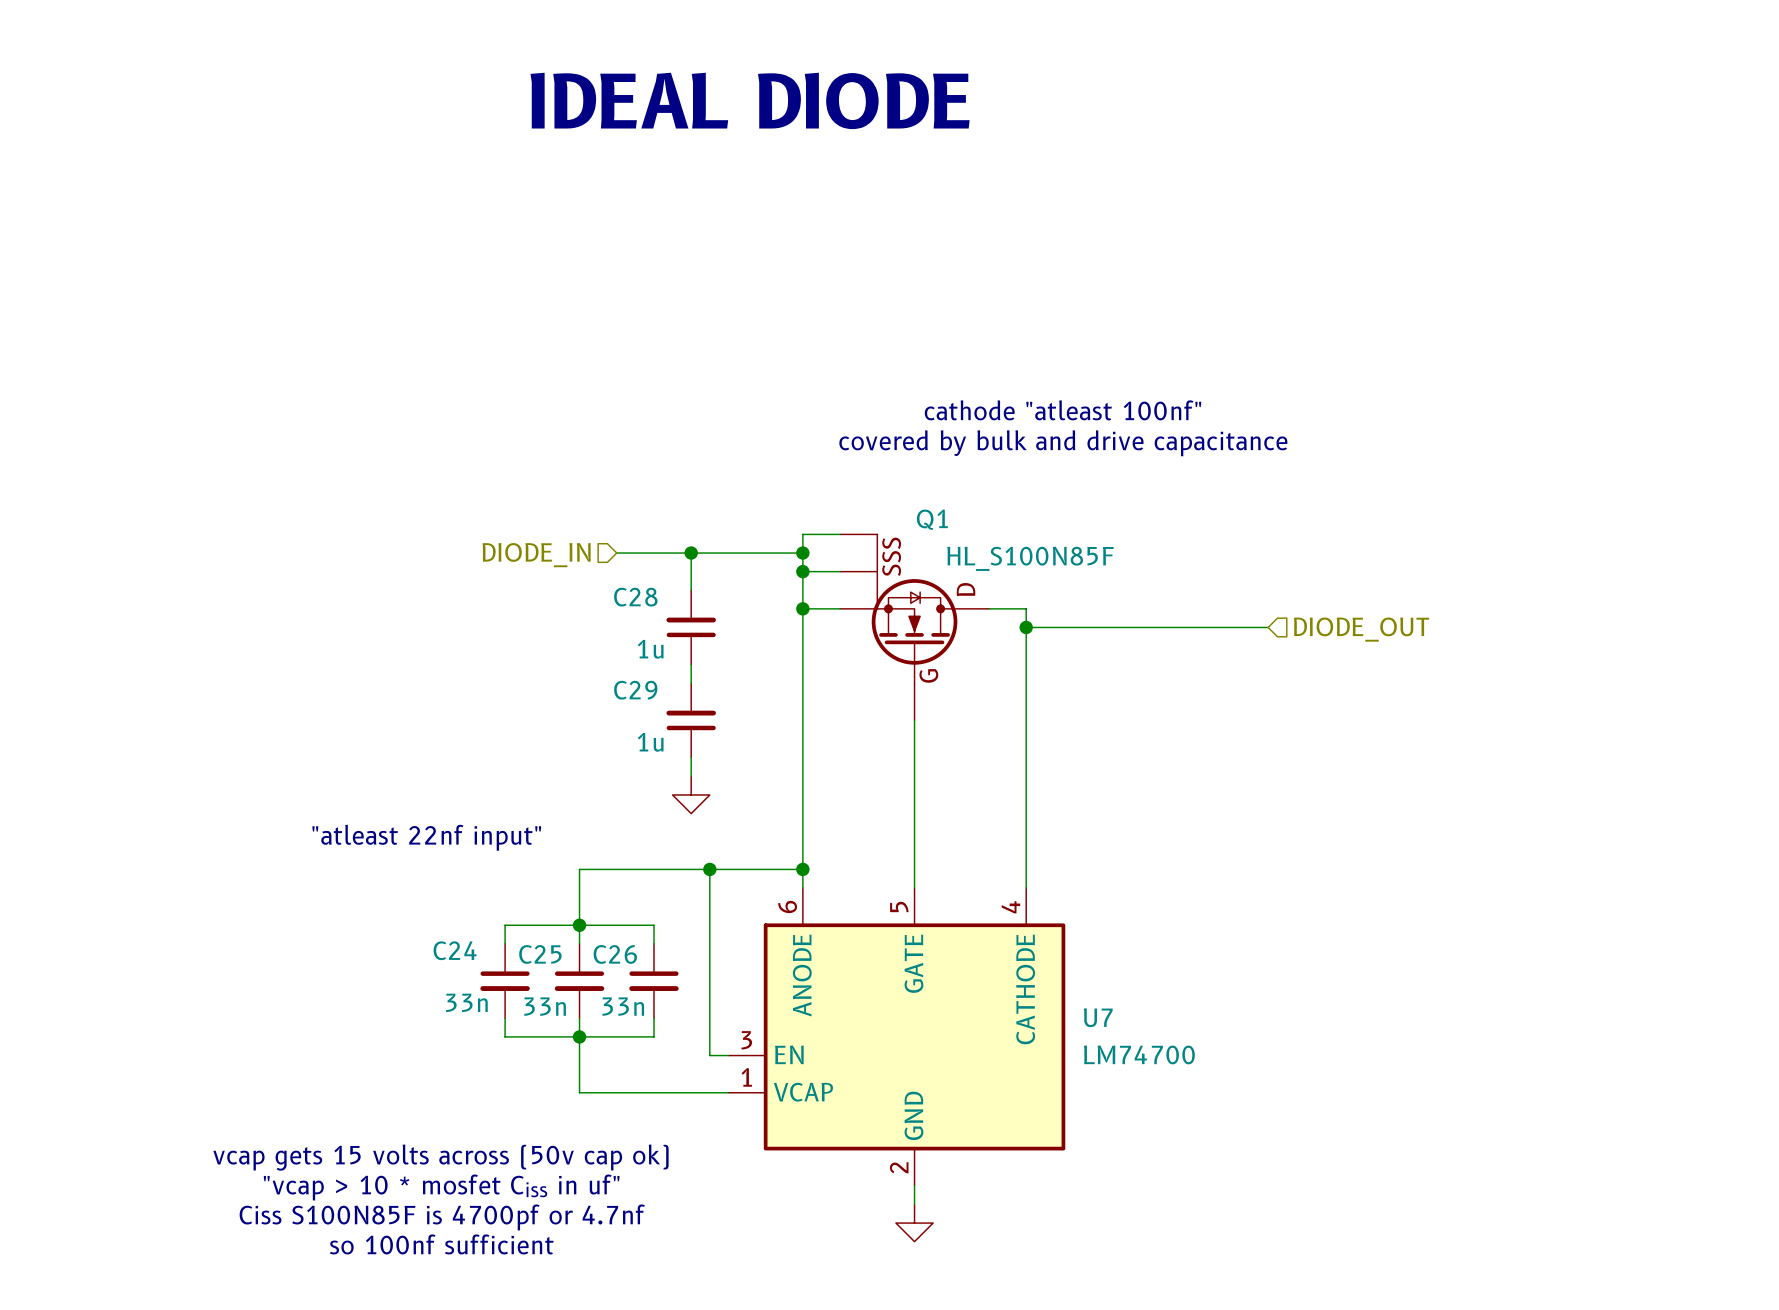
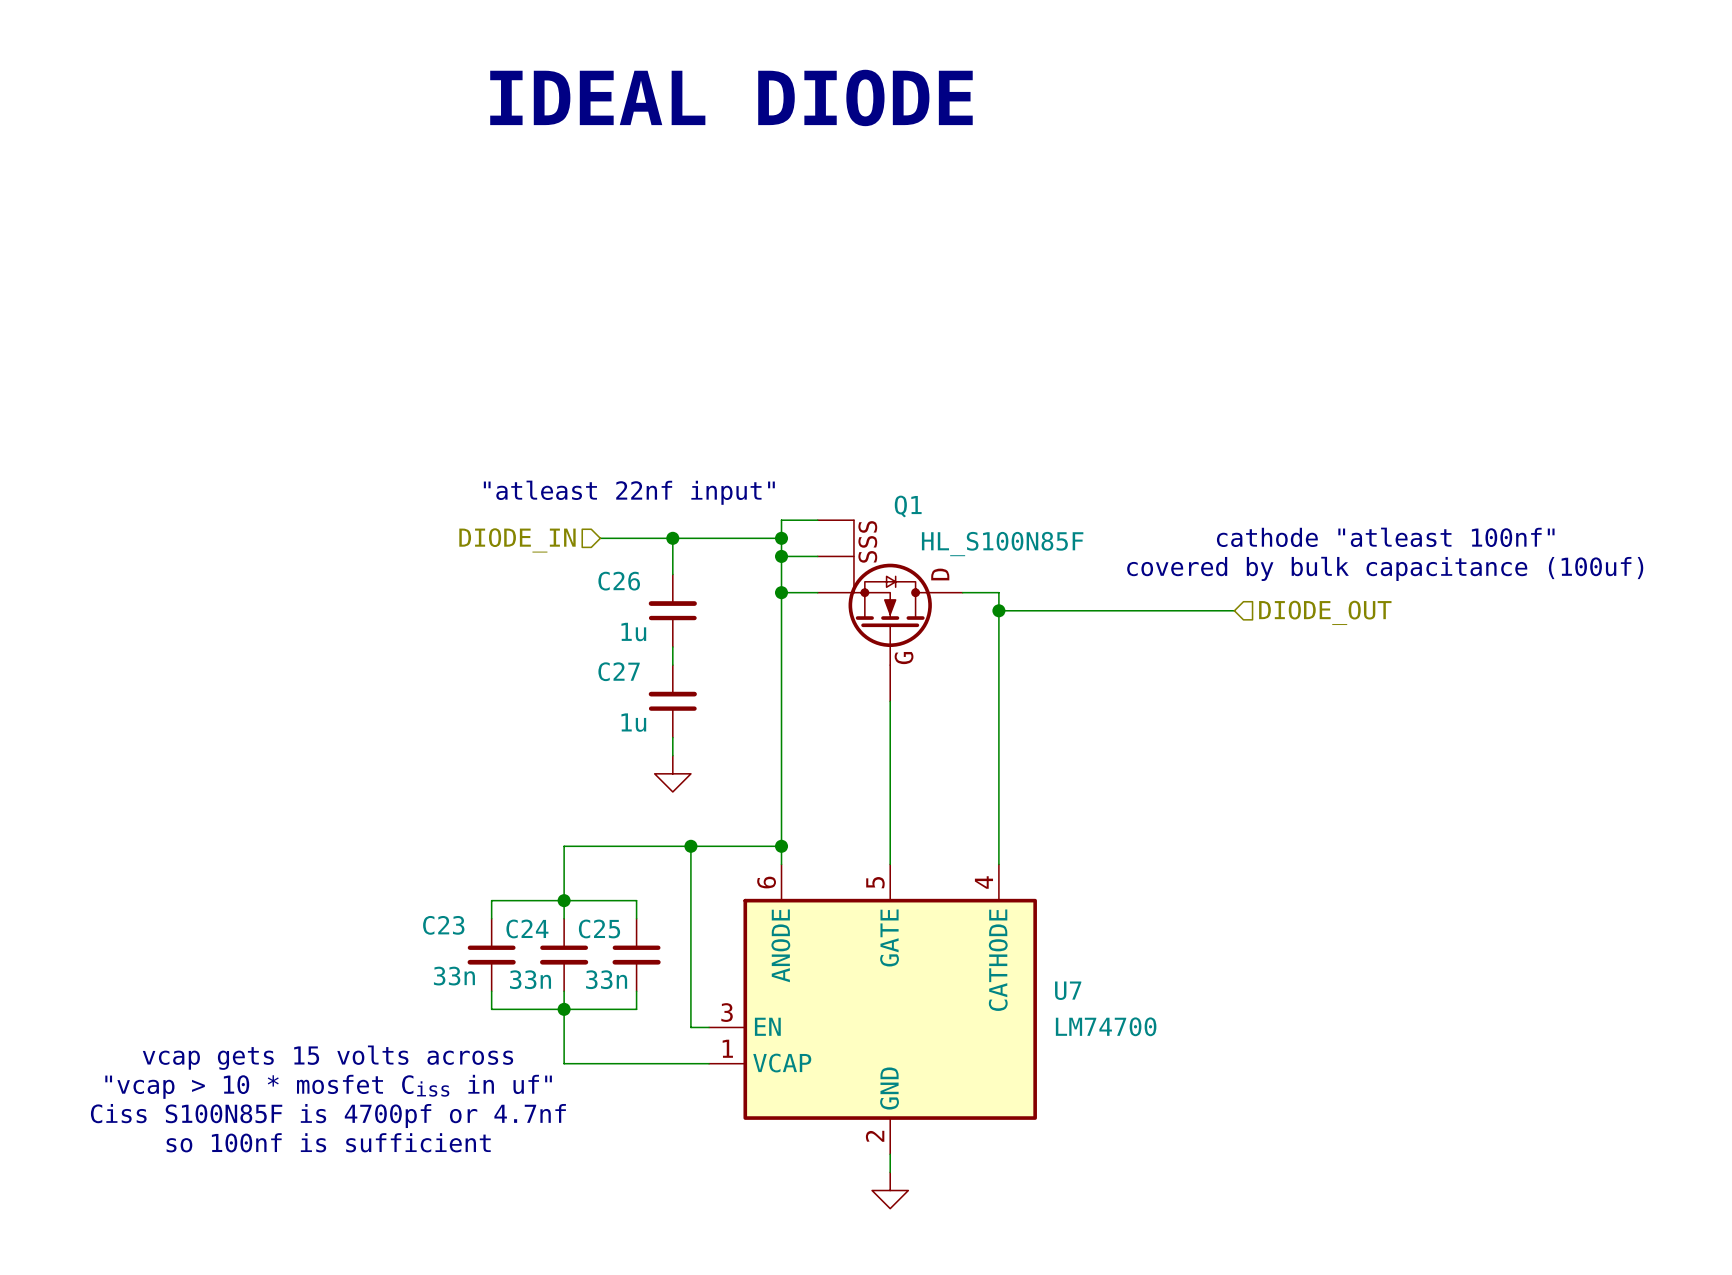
text: cathode "atleast 100nf" (1062, 410) -> none
text: covered by bulk and drive capacitance (1063, 443) -> none
text: none -> "atleast 22nf input" (629, 492)
text: none -> cathode "atleast 100nf" (1385, 537)
text: none -> covered by bulk capacitance (100uf) (1385, 568)
C28 name: C28 (635, 597) -> C26 (619, 581)
C29 name: C29 (635, 690) -> C27 (619, 671)
text: "atleast 22nf input" (426, 837) -> none
C24 name: C24 (455, 950) -> C23 (443, 925)
C25 name: C25 (540, 954) -> C24 (527, 928)
C26 name: C26 (615, 954) -> C25 (599, 928)
text: none -> vcap gets 15 volts across (327, 1057)
text: vcap gets 15 volts across (50v cap ok) (441, 1157) -> none
text: none -> so 100nf is sufficient (328, 1142)
text position: "vcap > 10 * mosfet Ciss in uf" (441, 1187) -> "vcap > 10 * mosfet Ciss in uf" (328, 1086)
text position: Ciss S100N85F is 4700pf or 4.7nf (442, 1217) -> Ciss S100N85F is 4700pf or 4.7nf (328, 1116)
text: so 100nf sufficient (441, 1244) -> none

